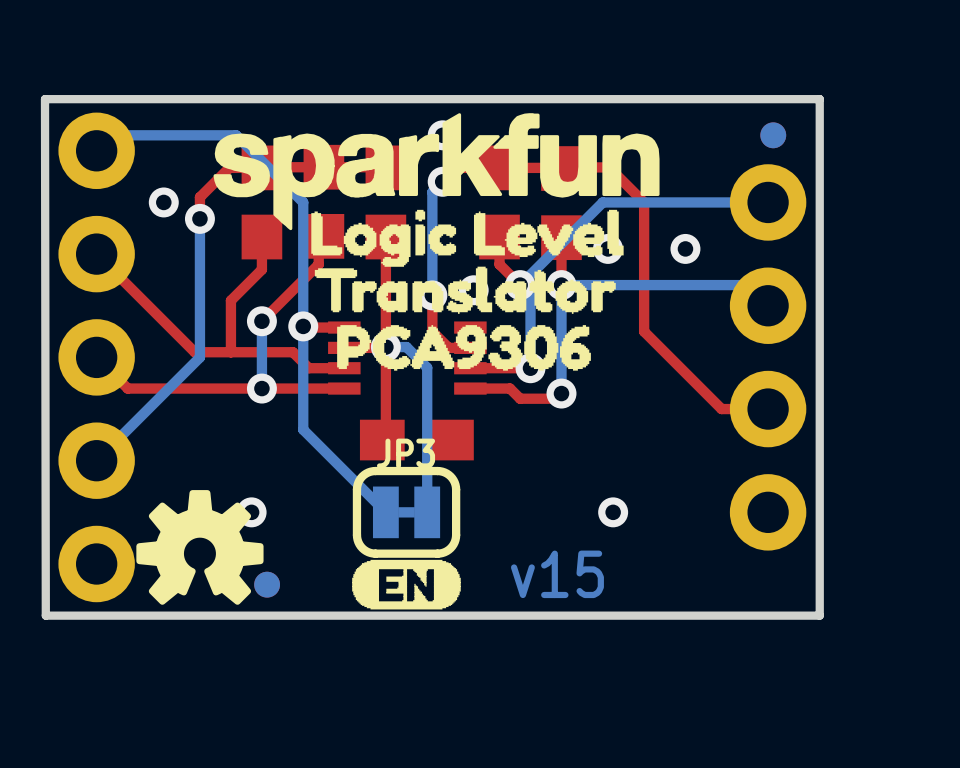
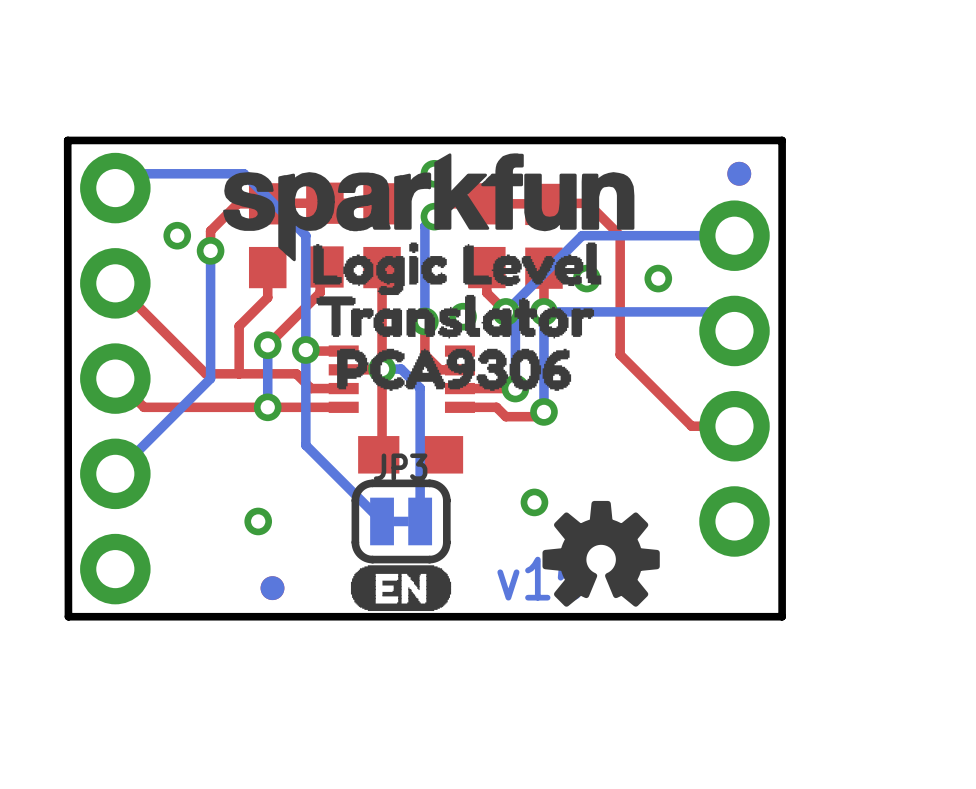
via position: (613, 512) -> (534, 502)
drawing position: (199, 547) -> (601, 553)

